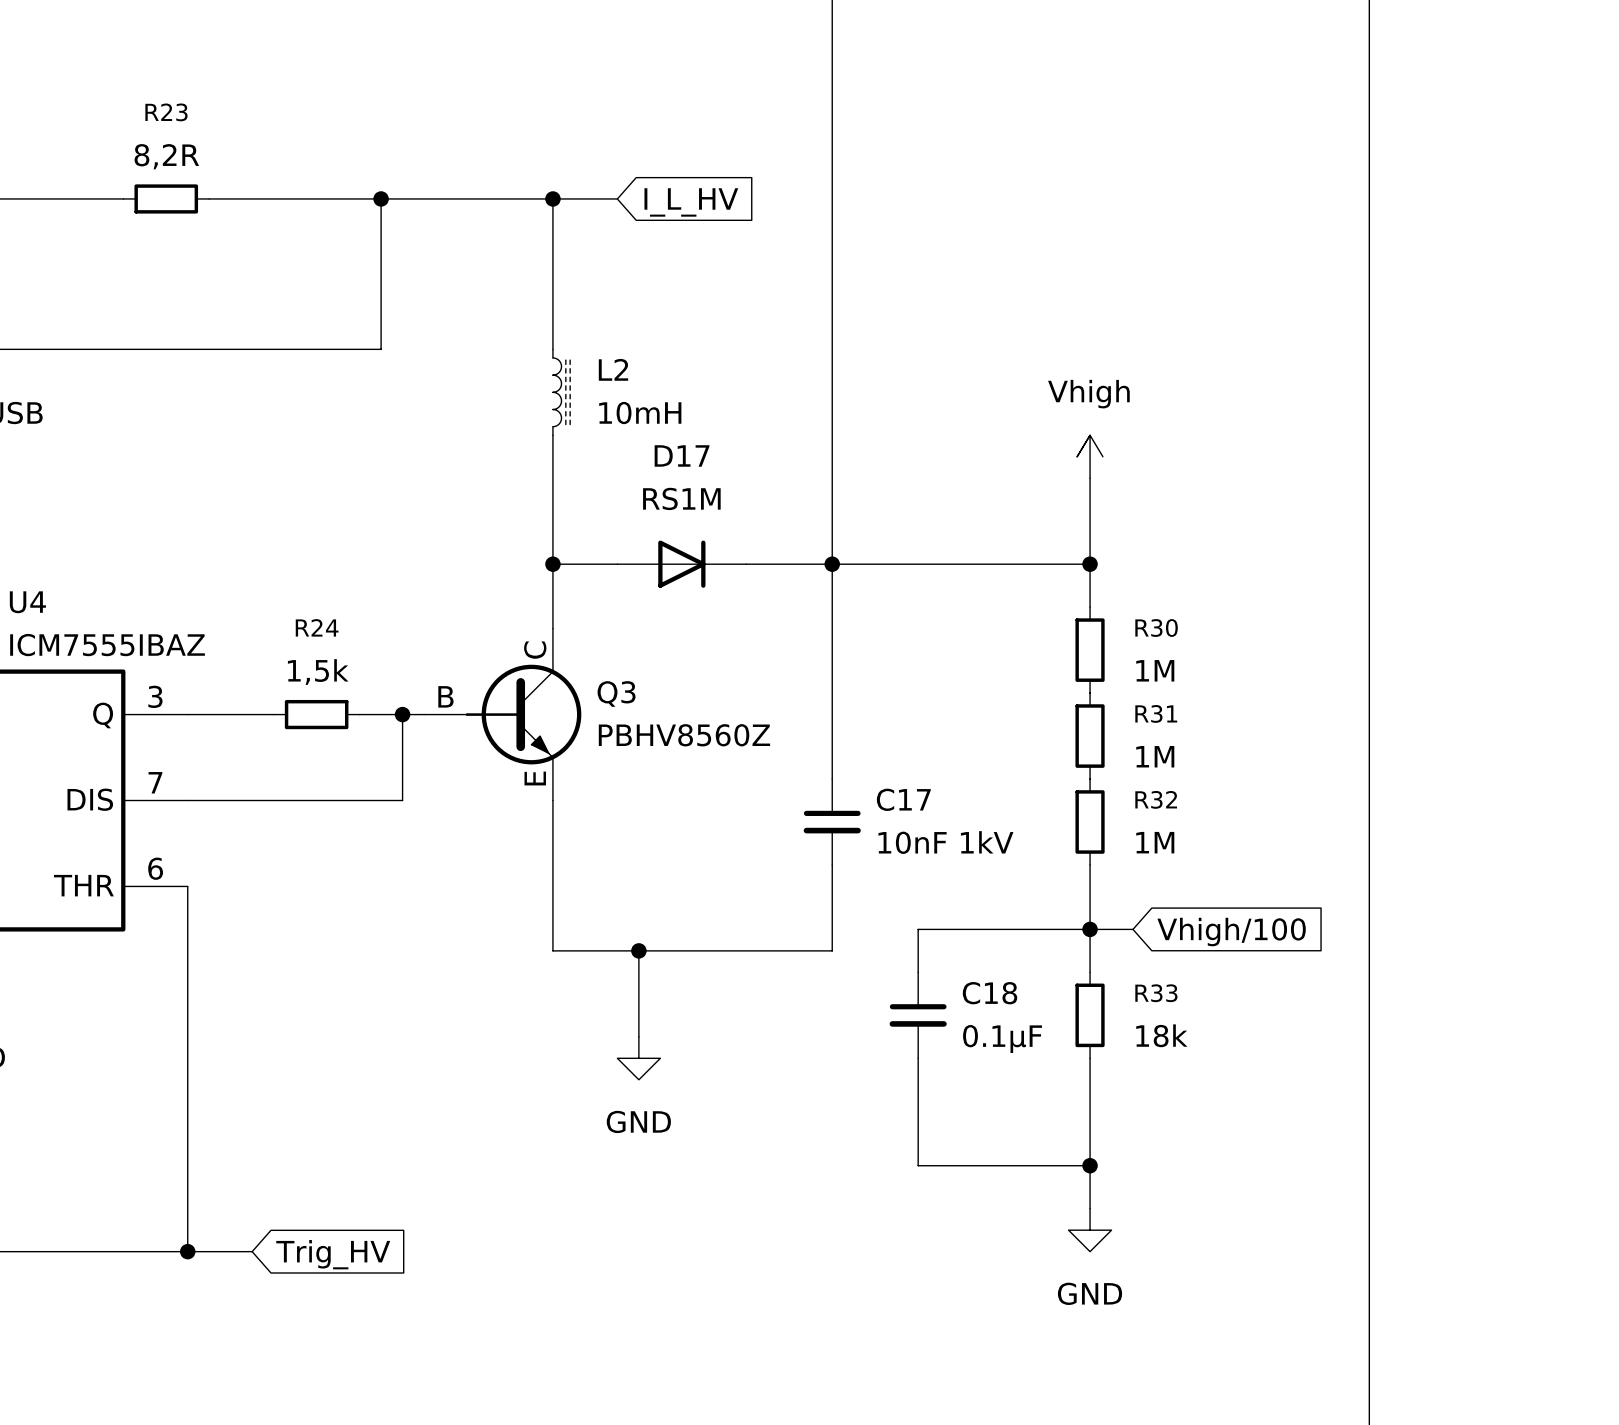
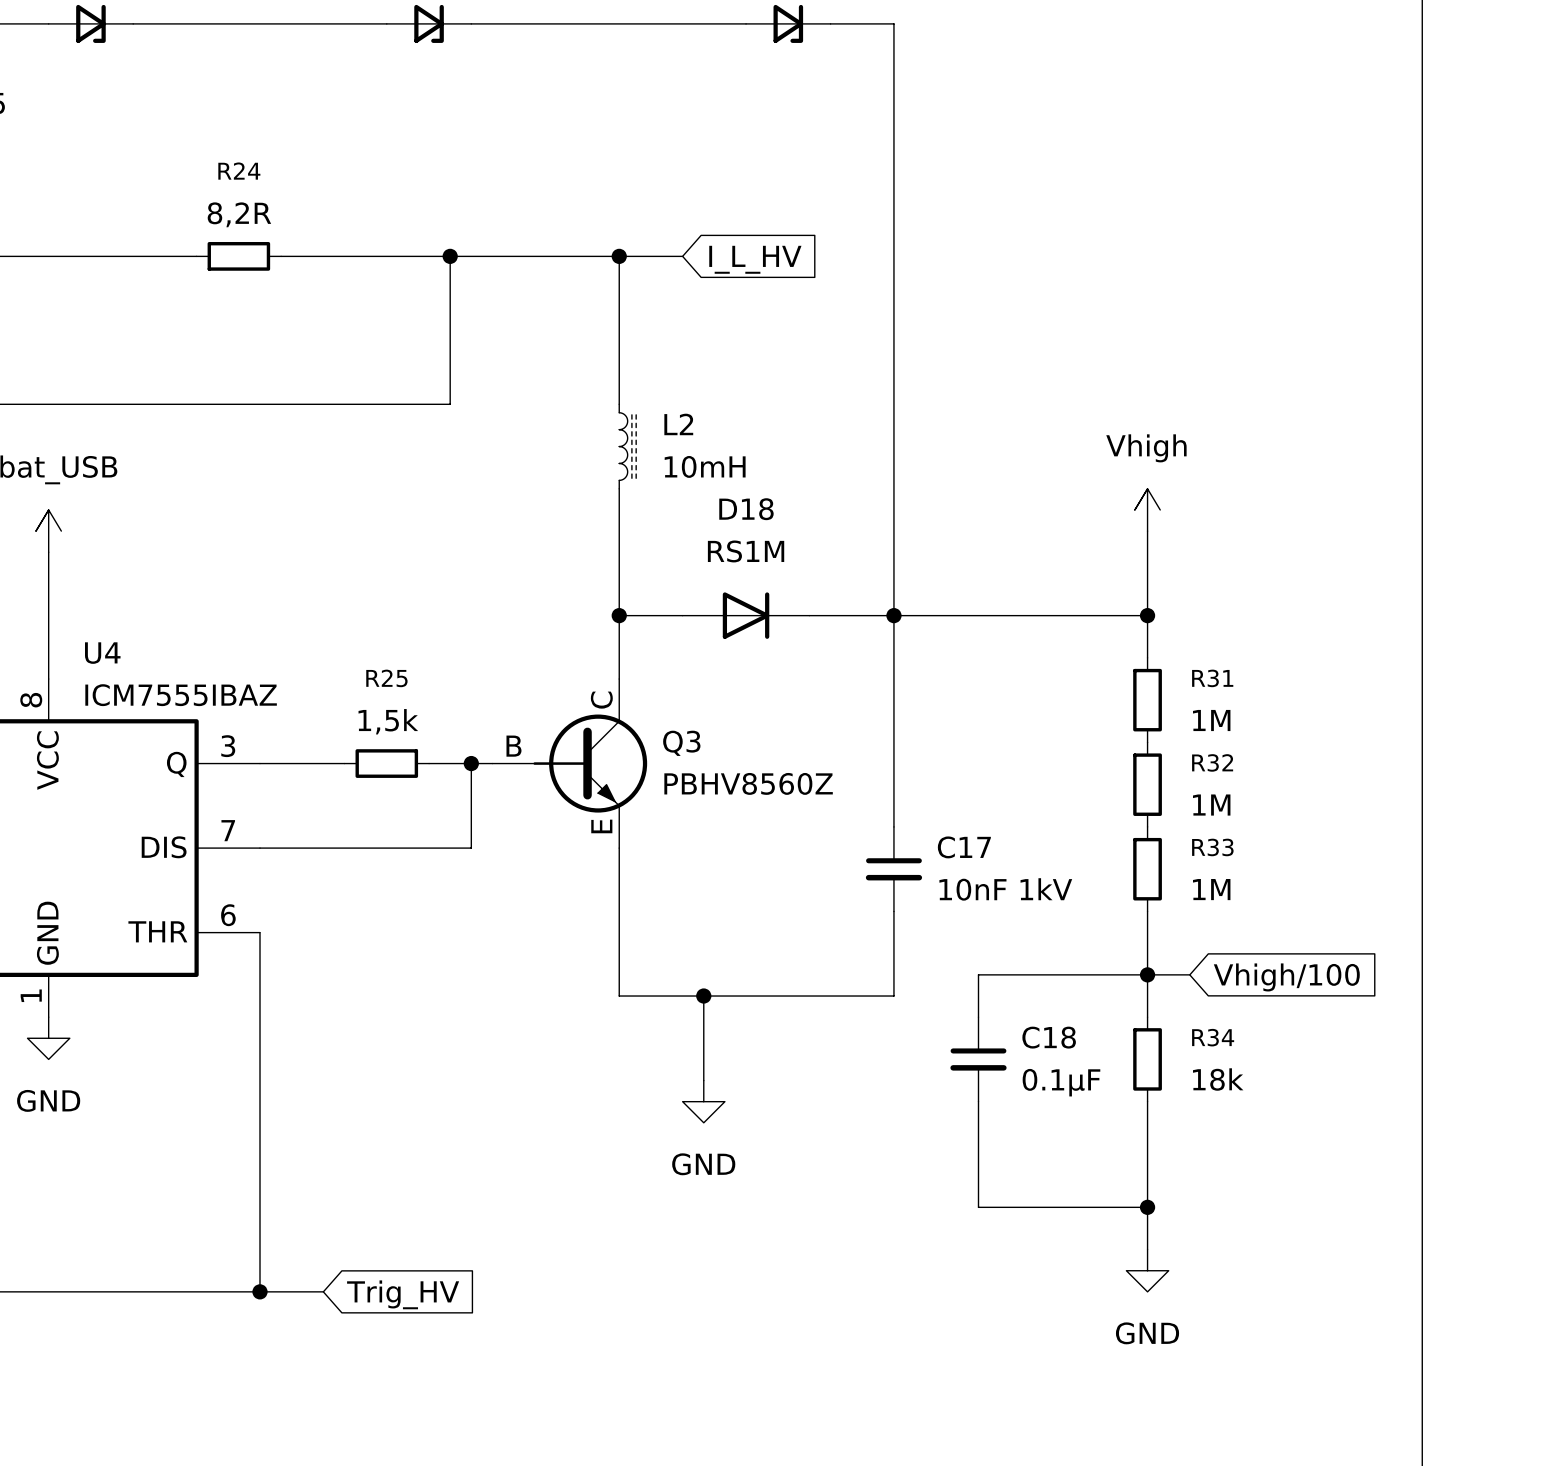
R23 name: R23 (166, 112) -> R24 (239, 171)
D17 name: D17 (682, 455) -> D18 (746, 509)
R24 name: R24 (317, 627) -> R25 (386, 678)
R30 name: R30 (1156, 628) -> R31 (1212, 678)
R31 name: R31 (1156, 713) -> R32 (1212, 762)
R32 name: R32 (1156, 799) -> R33 (1212, 847)
R33 name: R33 (1156, 993) -> R34 (1213, 1037)

